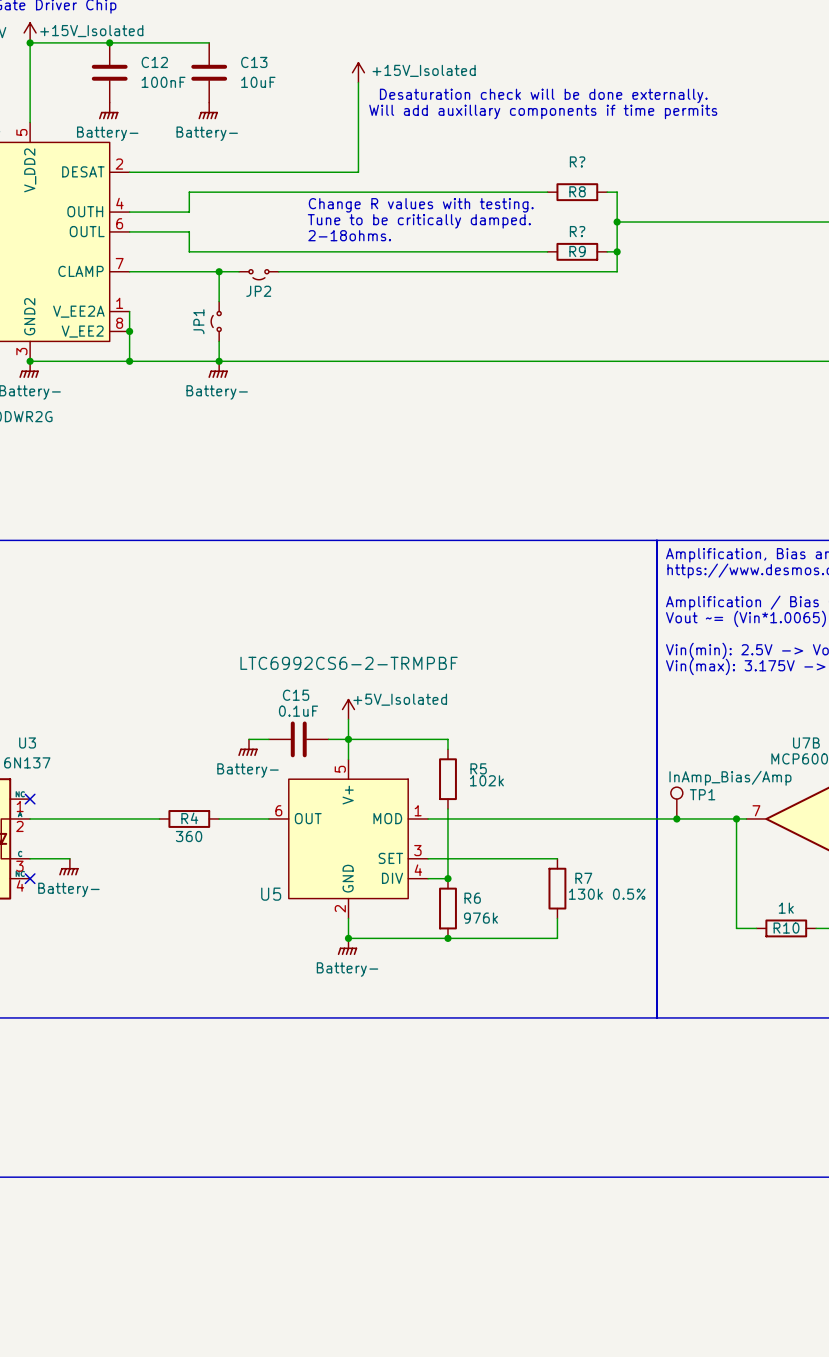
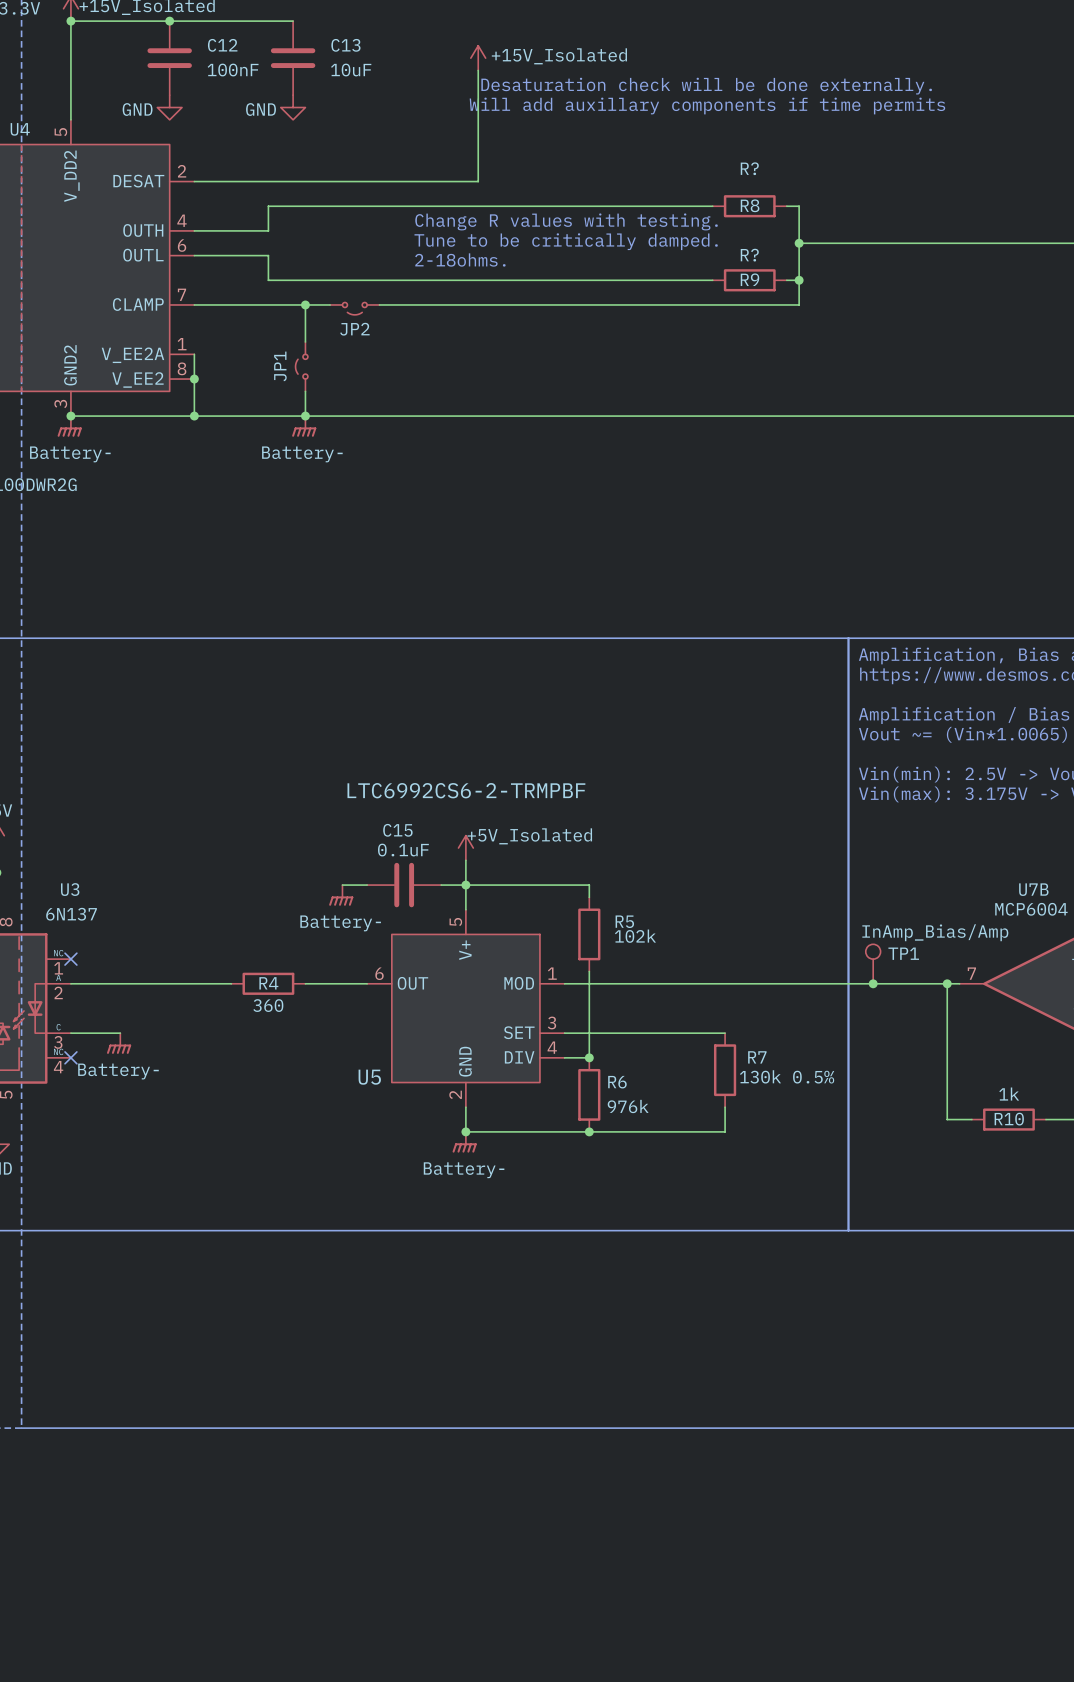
power symbol: Battery- (108, 110) -> GND (169, 107)
power symbol: Battery- (208, 110) -> GND (293, 107)

